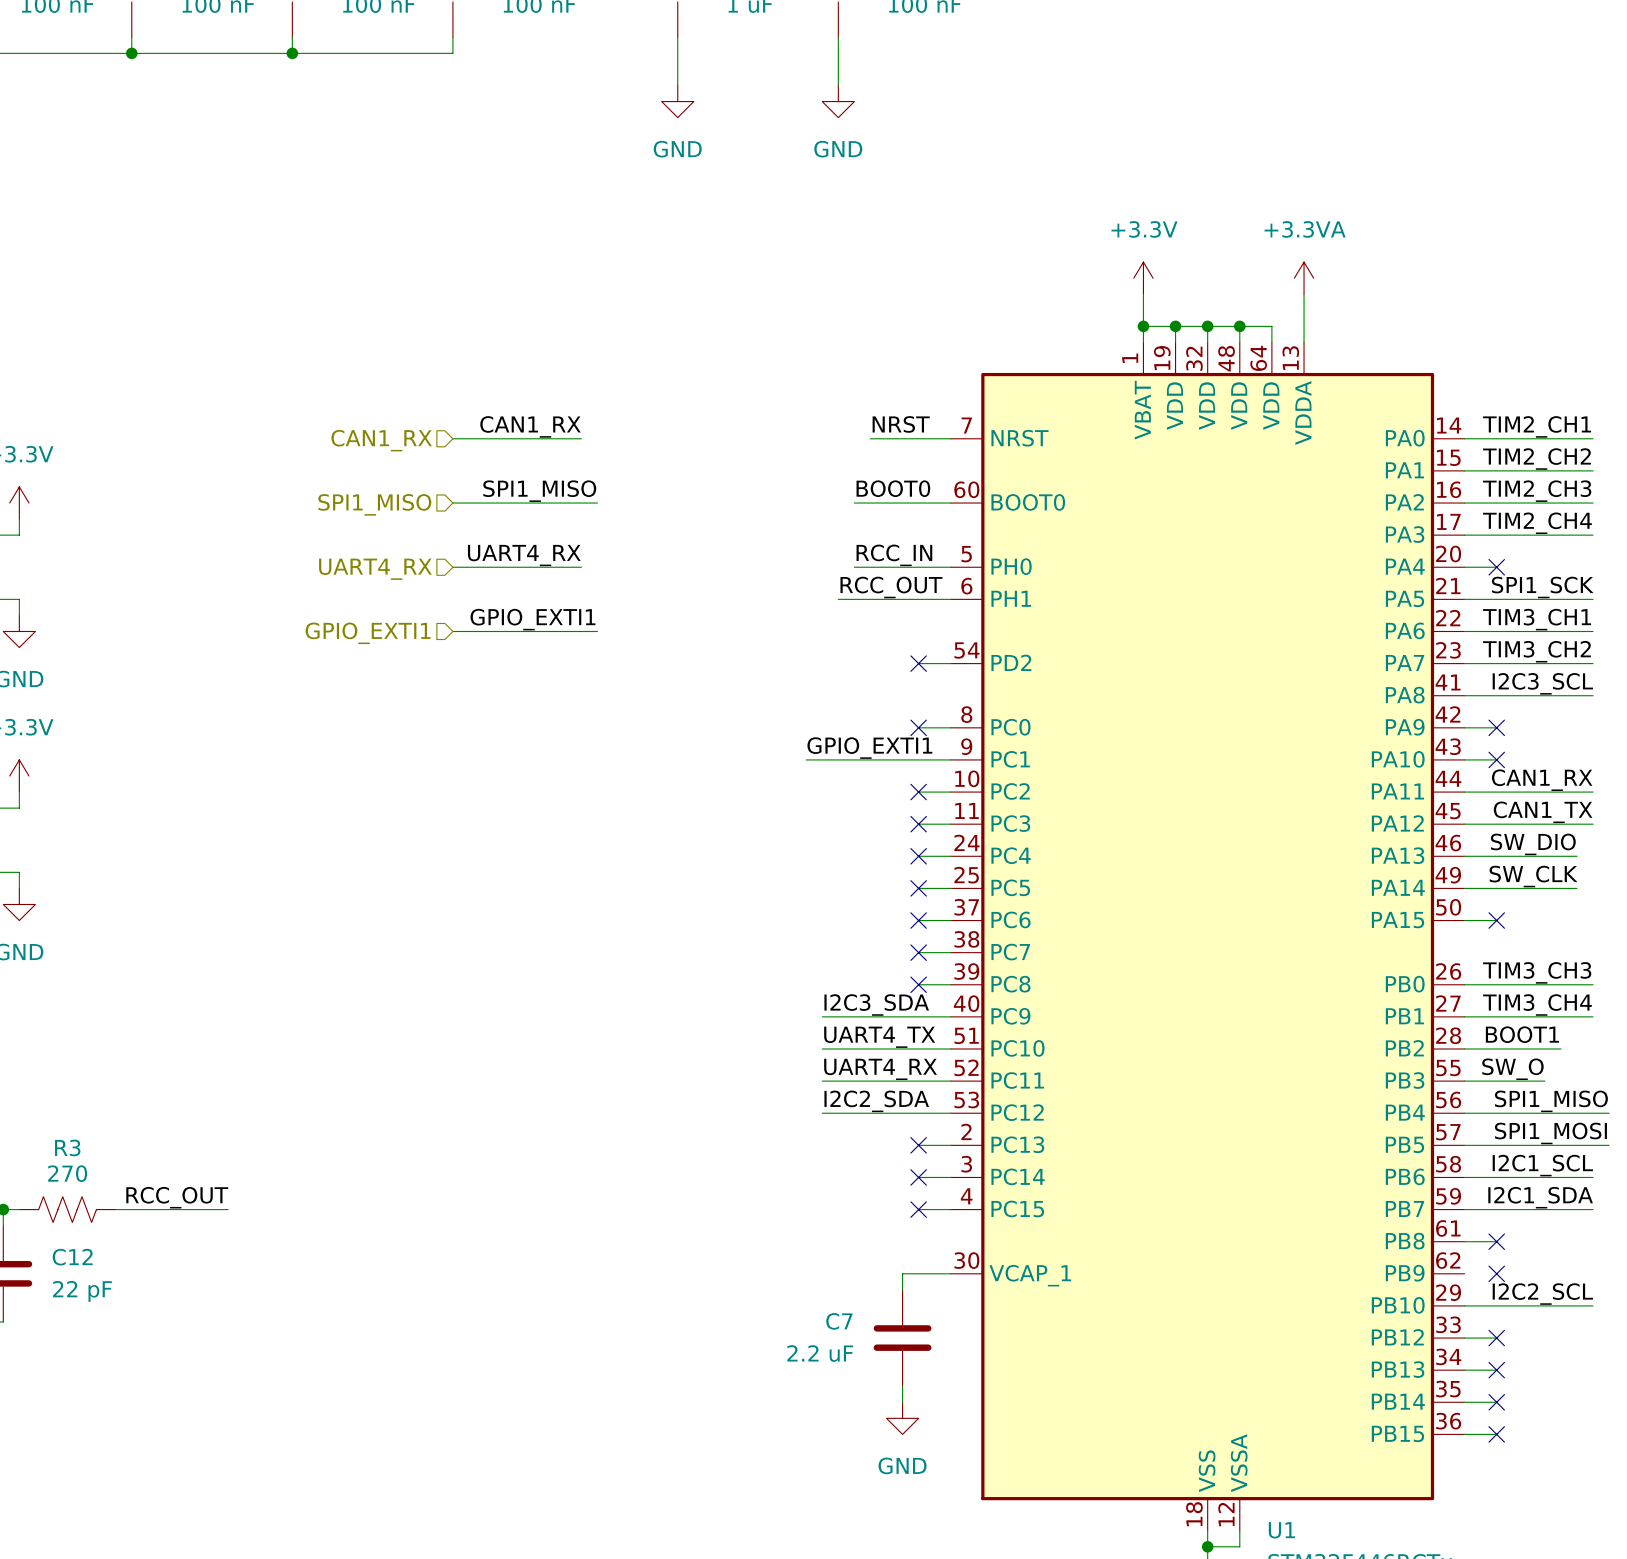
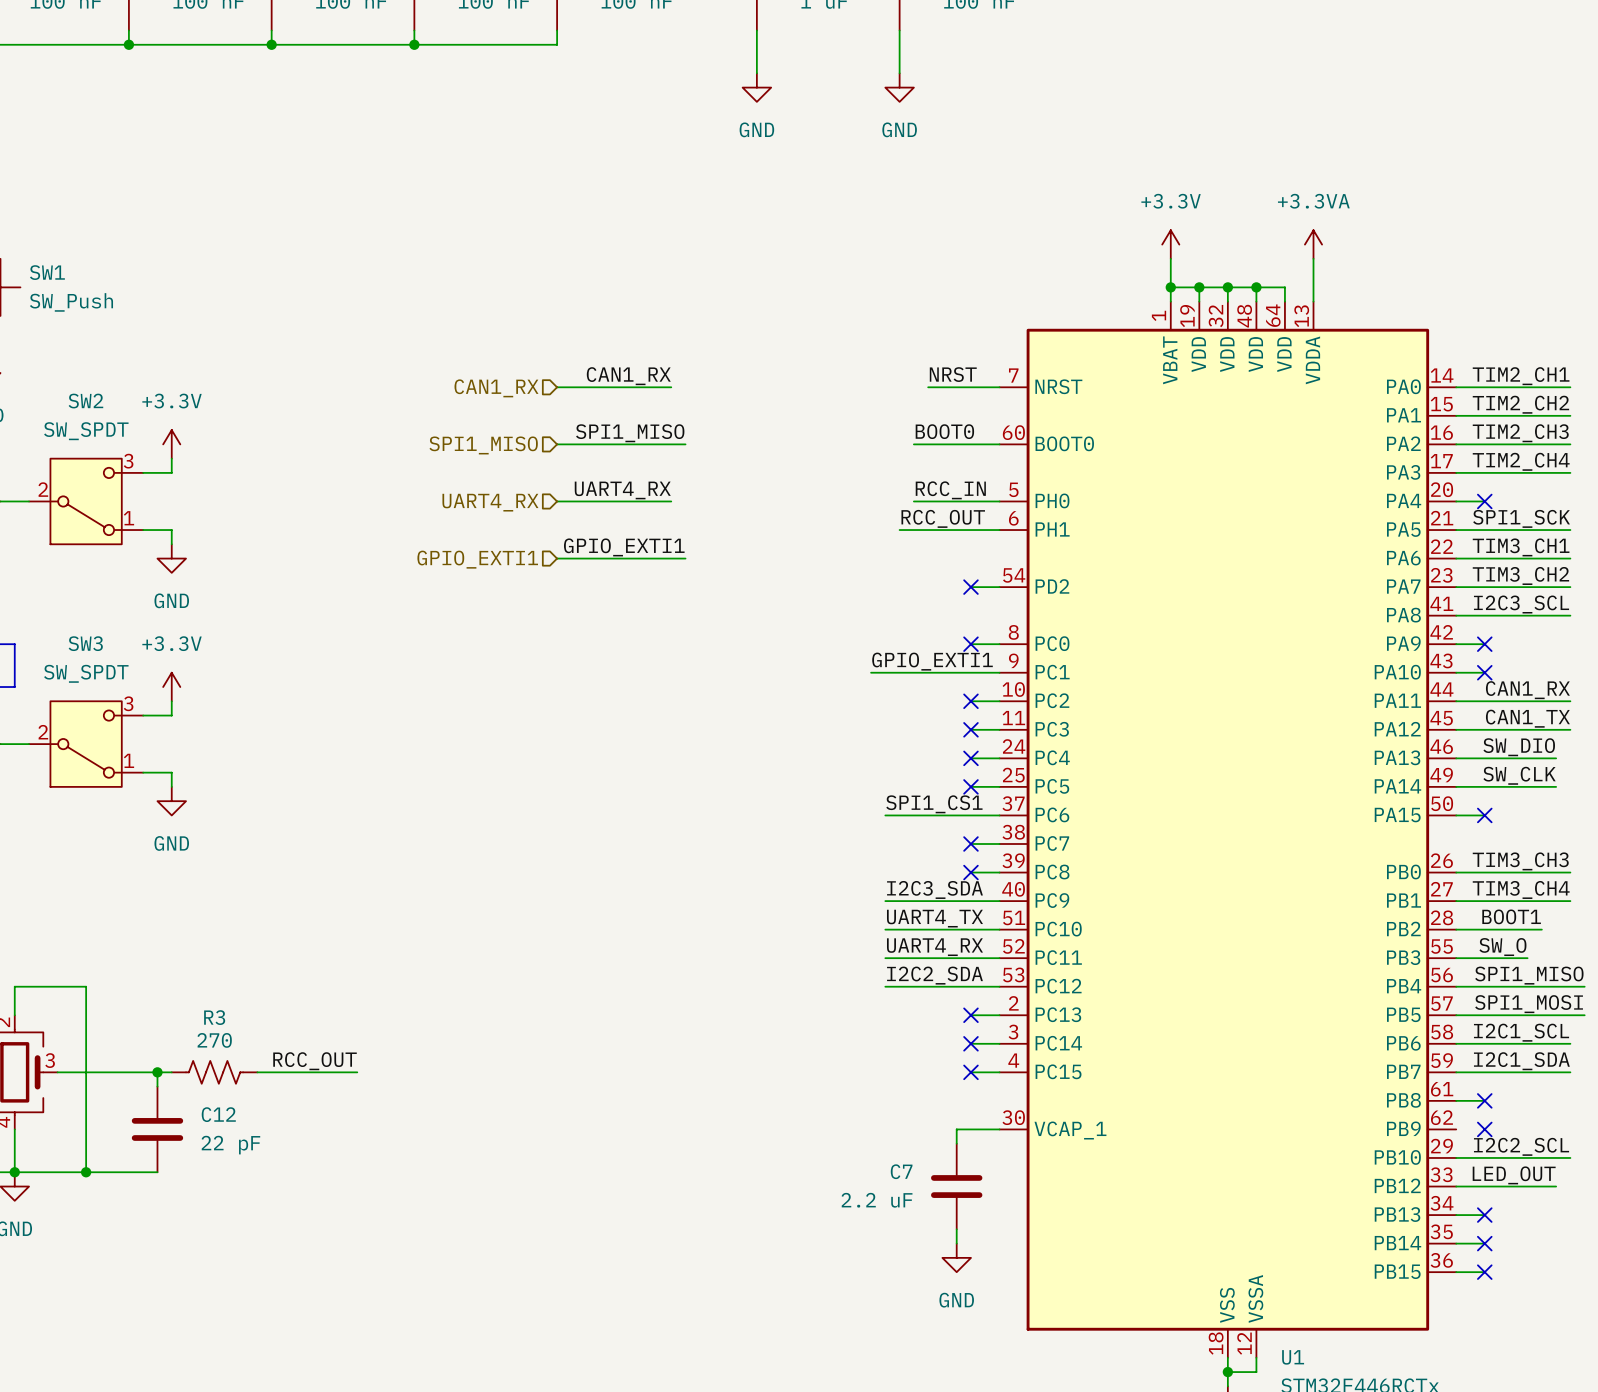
label: none -> SPI1_CS1 (934, 804)
wire: none -> (885, 815) (970, 815)
no-connect mark: (918, 920) -> none
label: none -> LED_OUT (1514, 1175)
wire: none -> (1484, 1186) (1556, 1186)
no-connect mark: (1496, 1338) -> none

